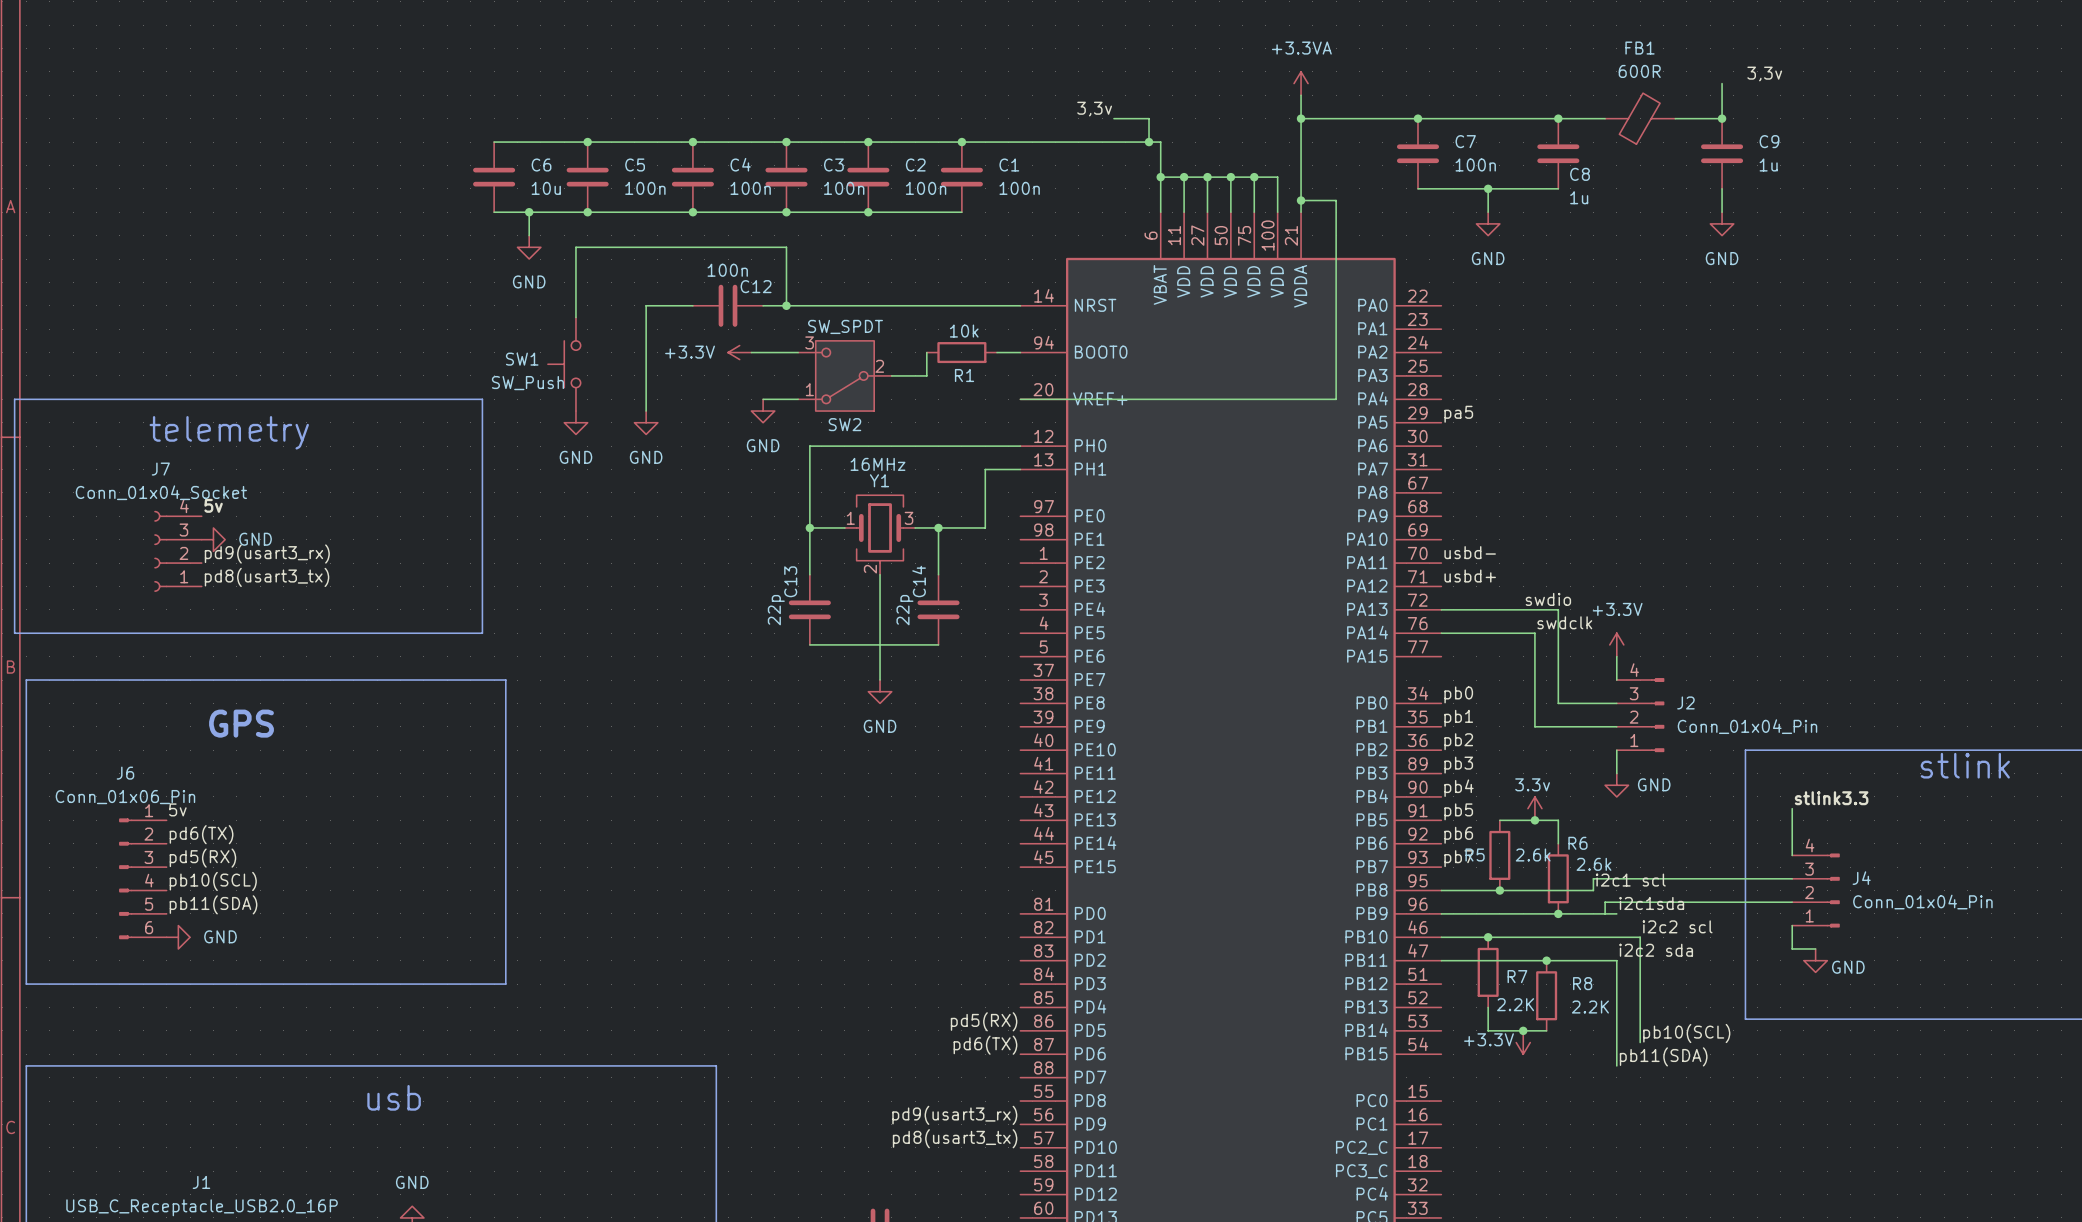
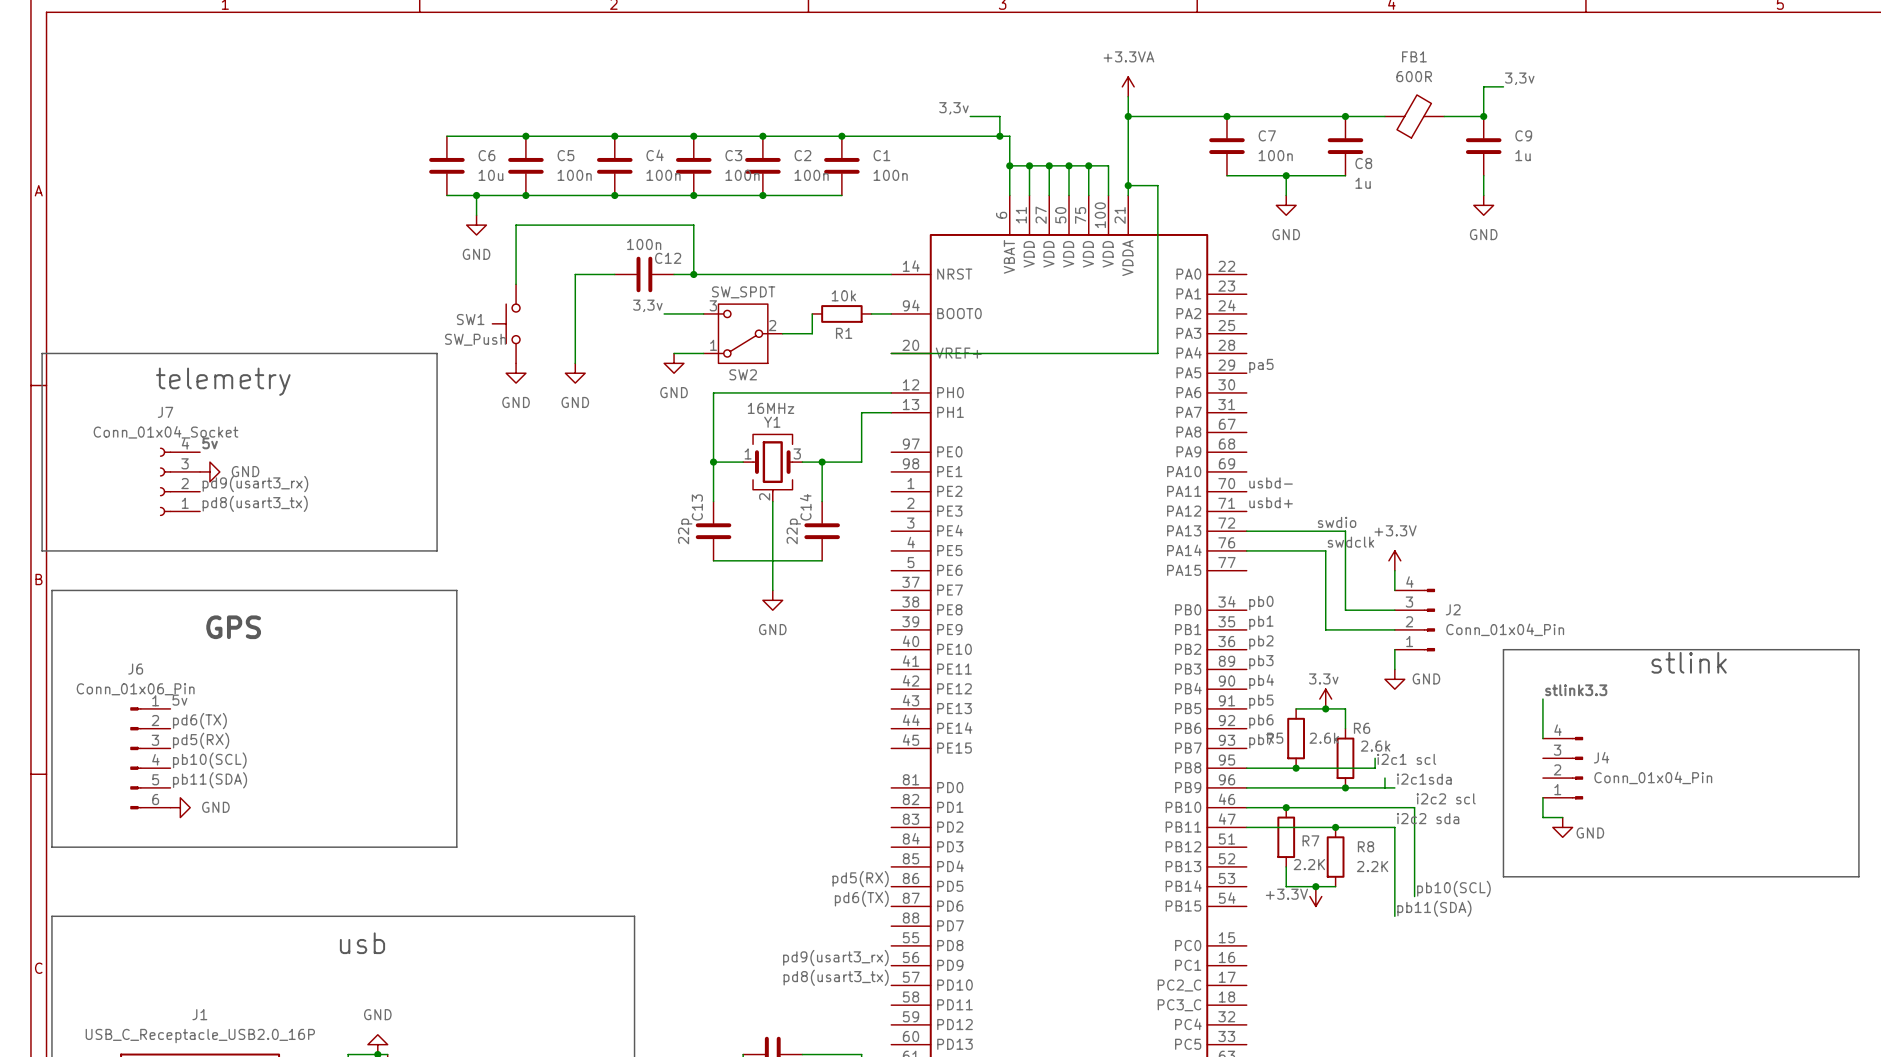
wire: none -> (1483, 86) (1503, 86)
label: none -> 3,3v (647, 305)
power symbol: +3.3V (739, 352) -> none
wire: (1593, 878) (1792, 878) -> none
wire: (1605, 902) (1792, 902) -> none

